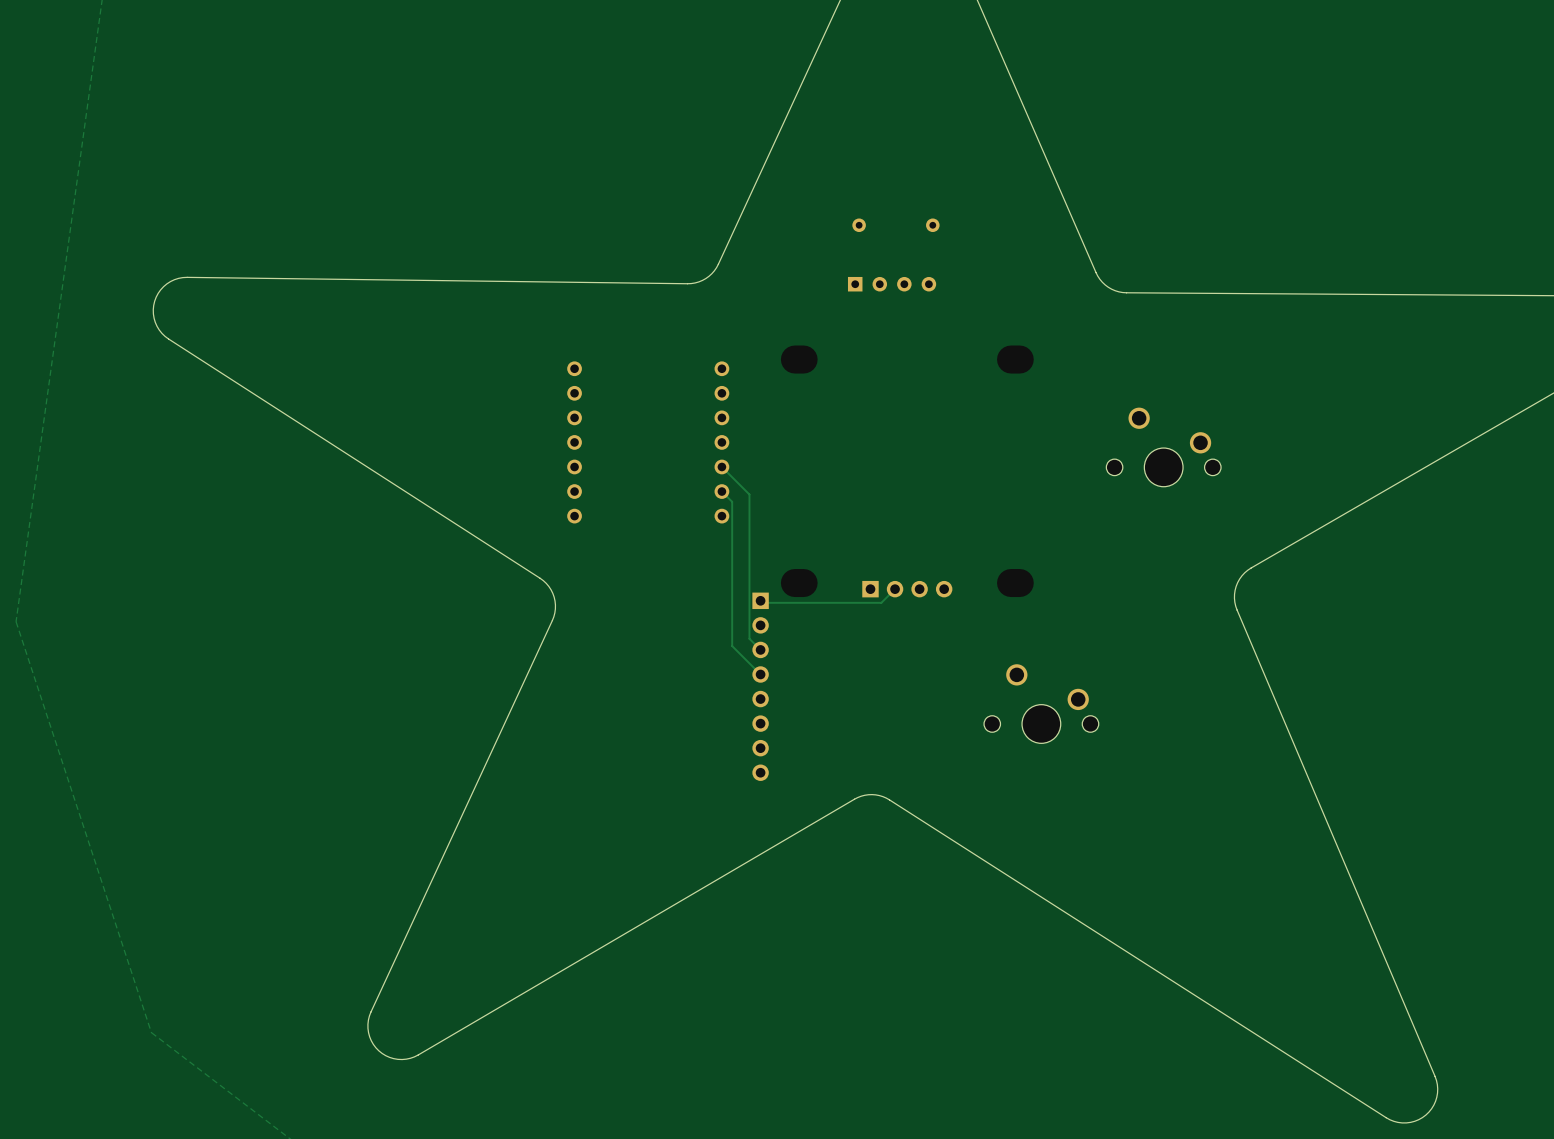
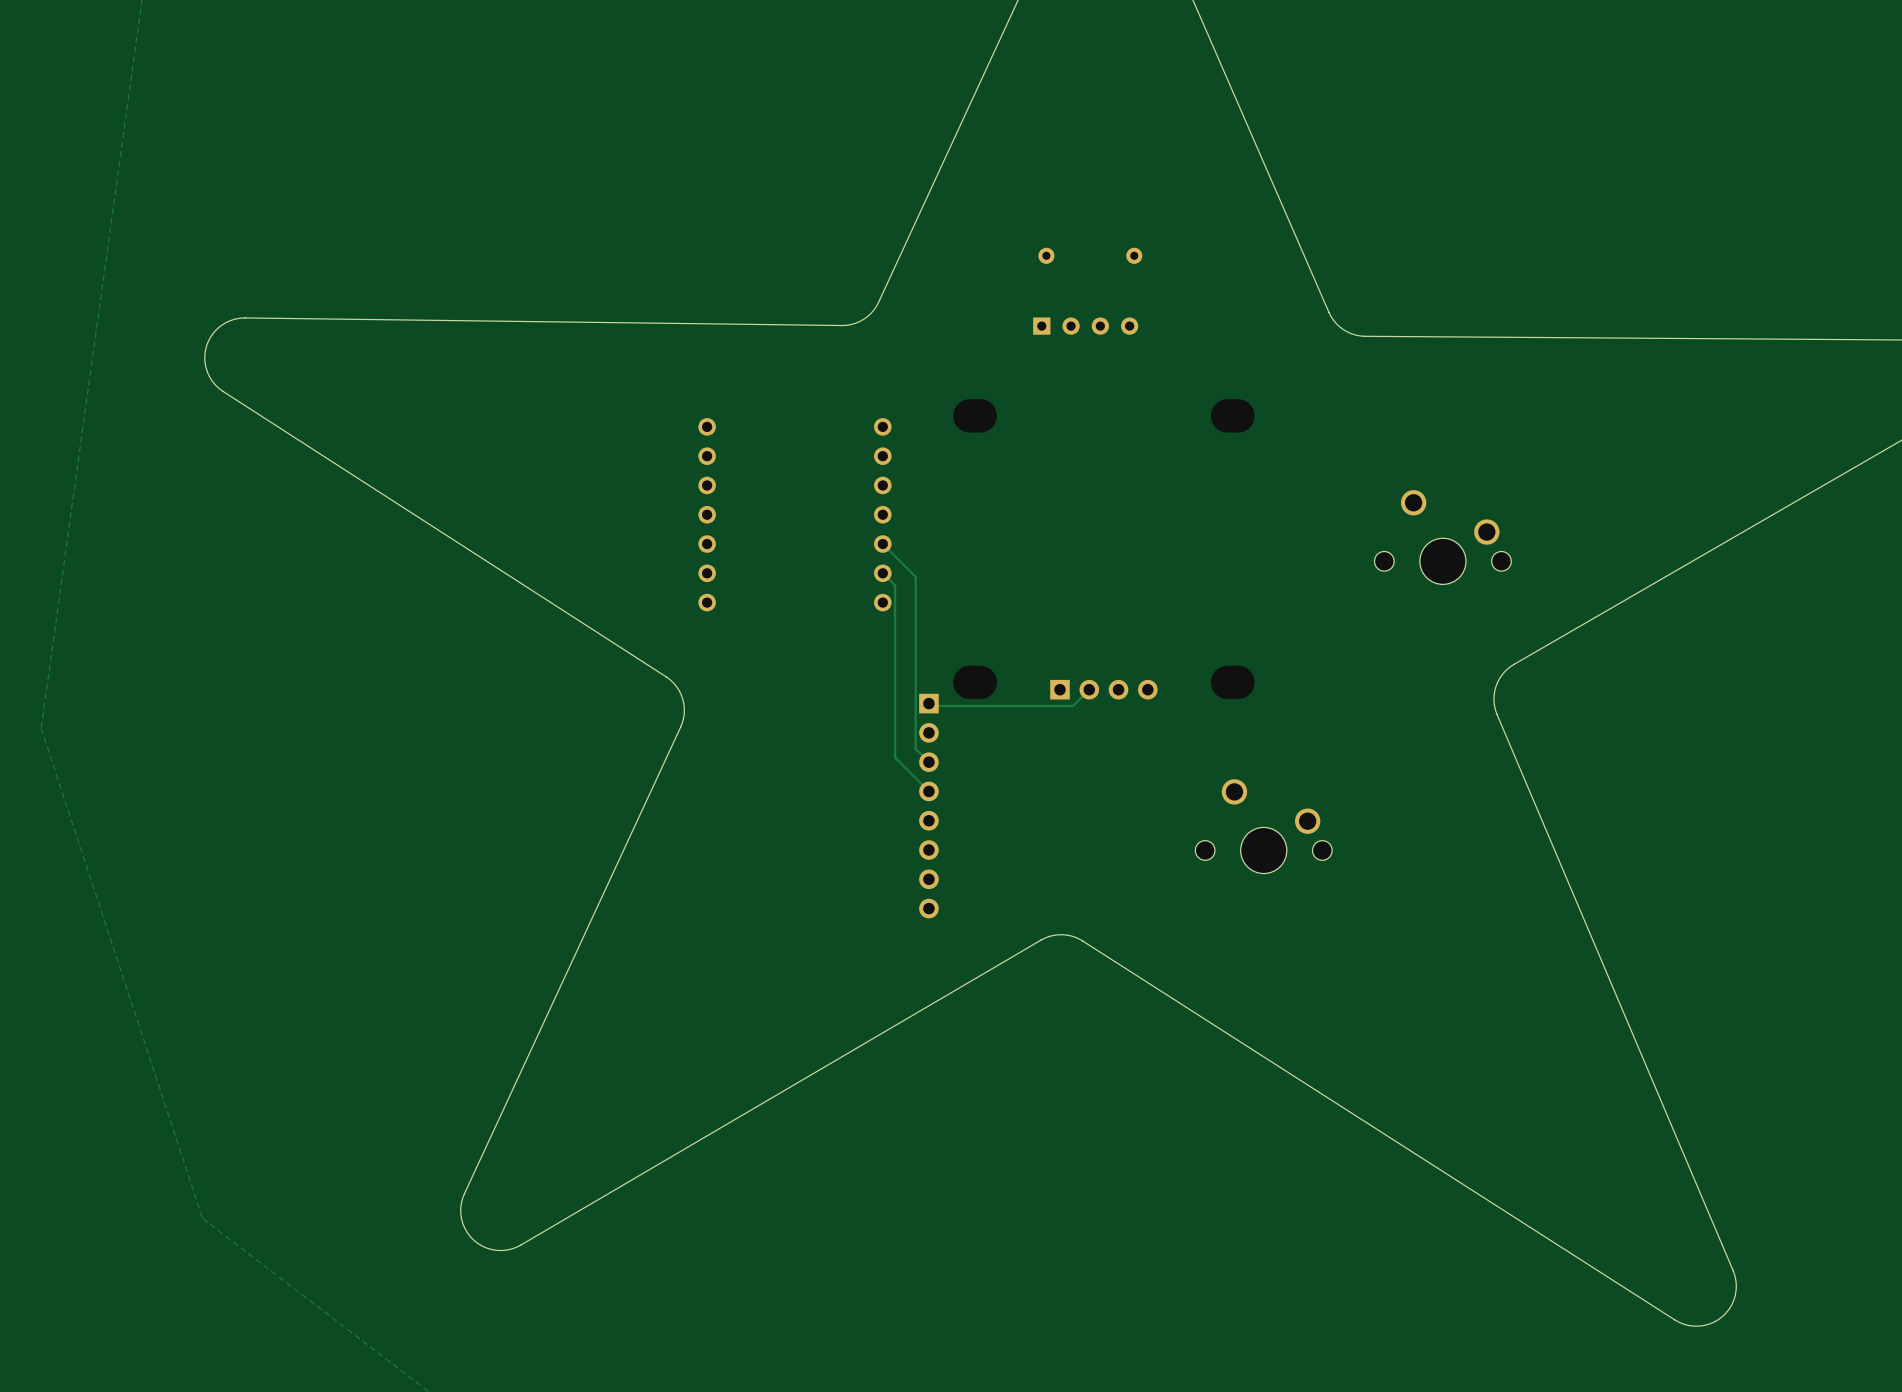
part position: (1163, 447) -> (1442, 537)

